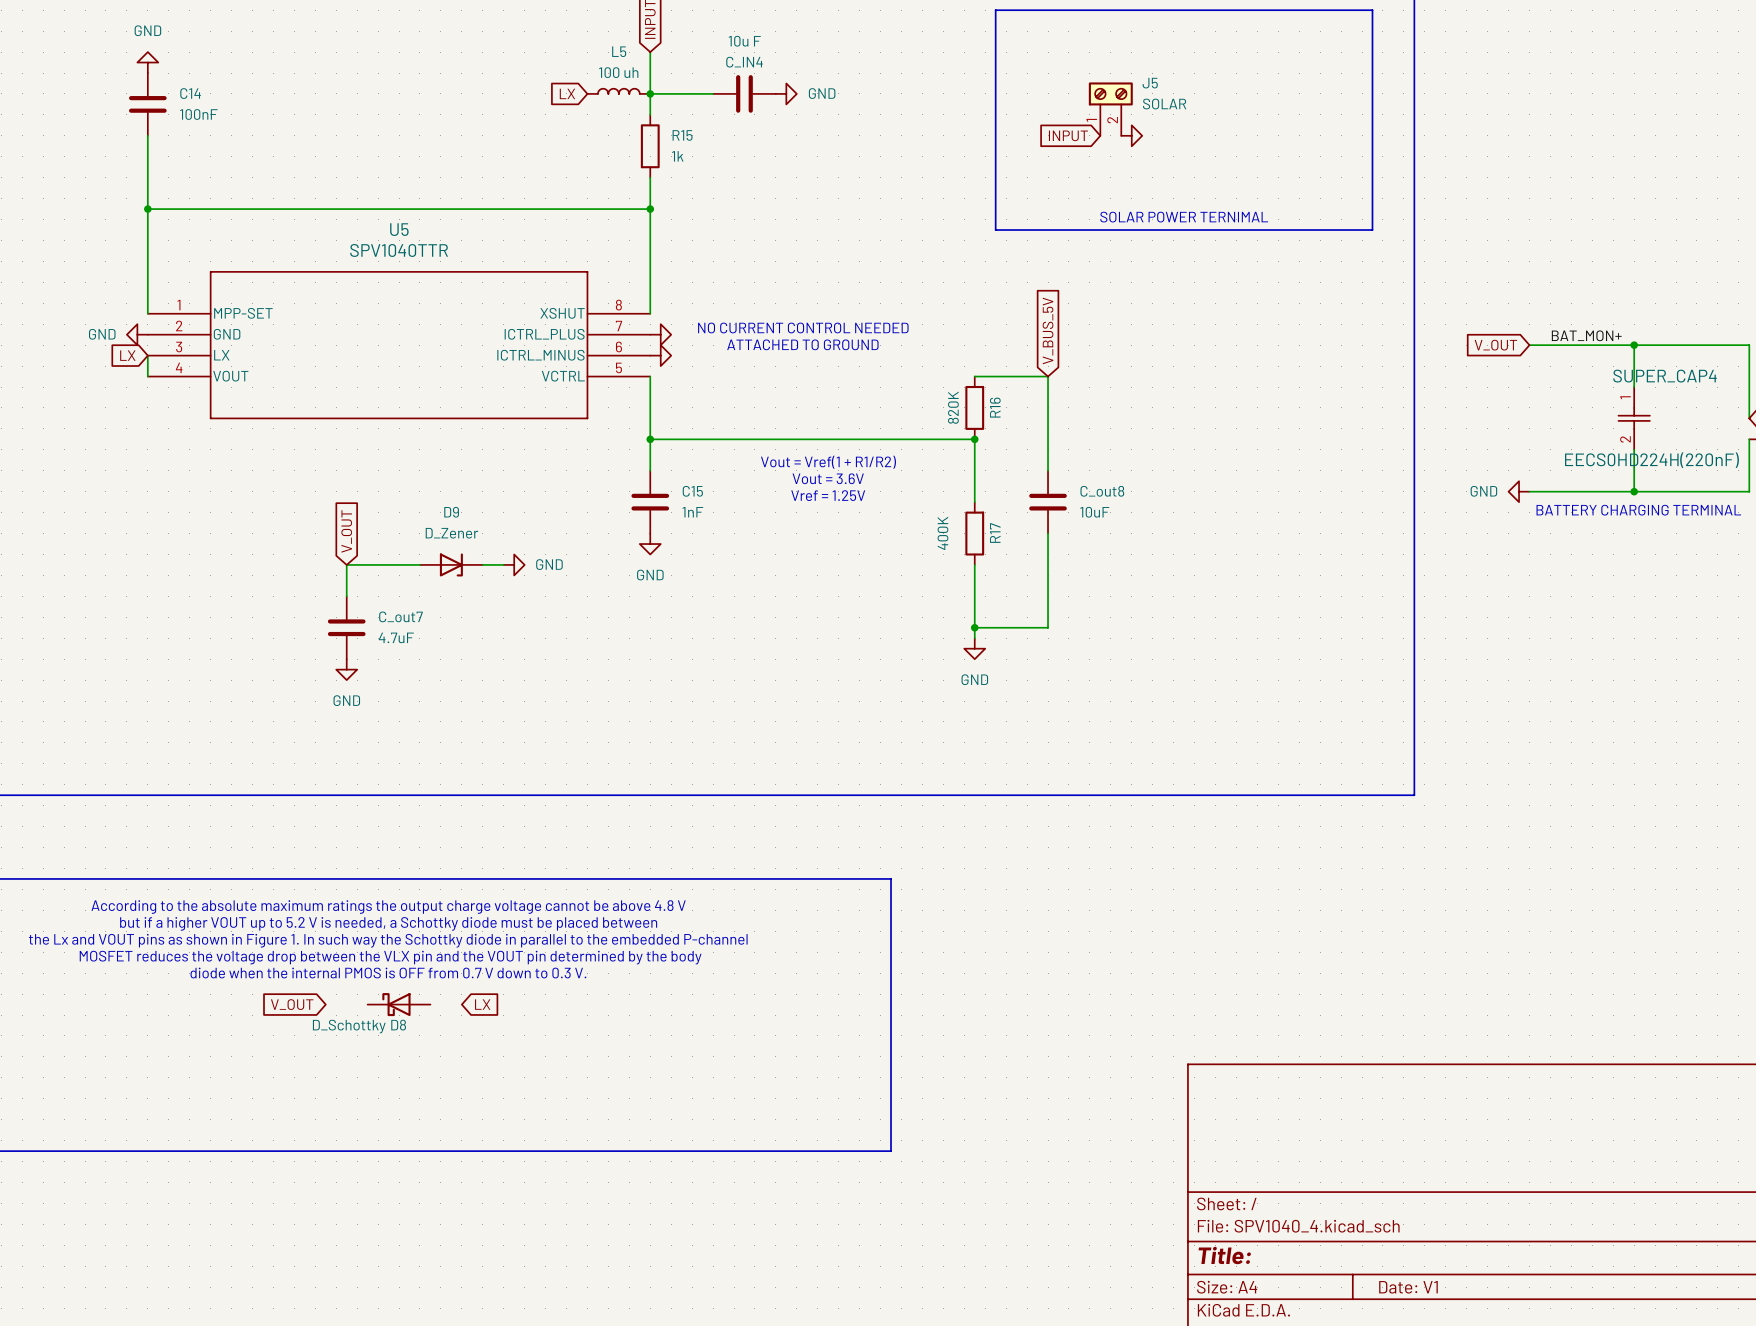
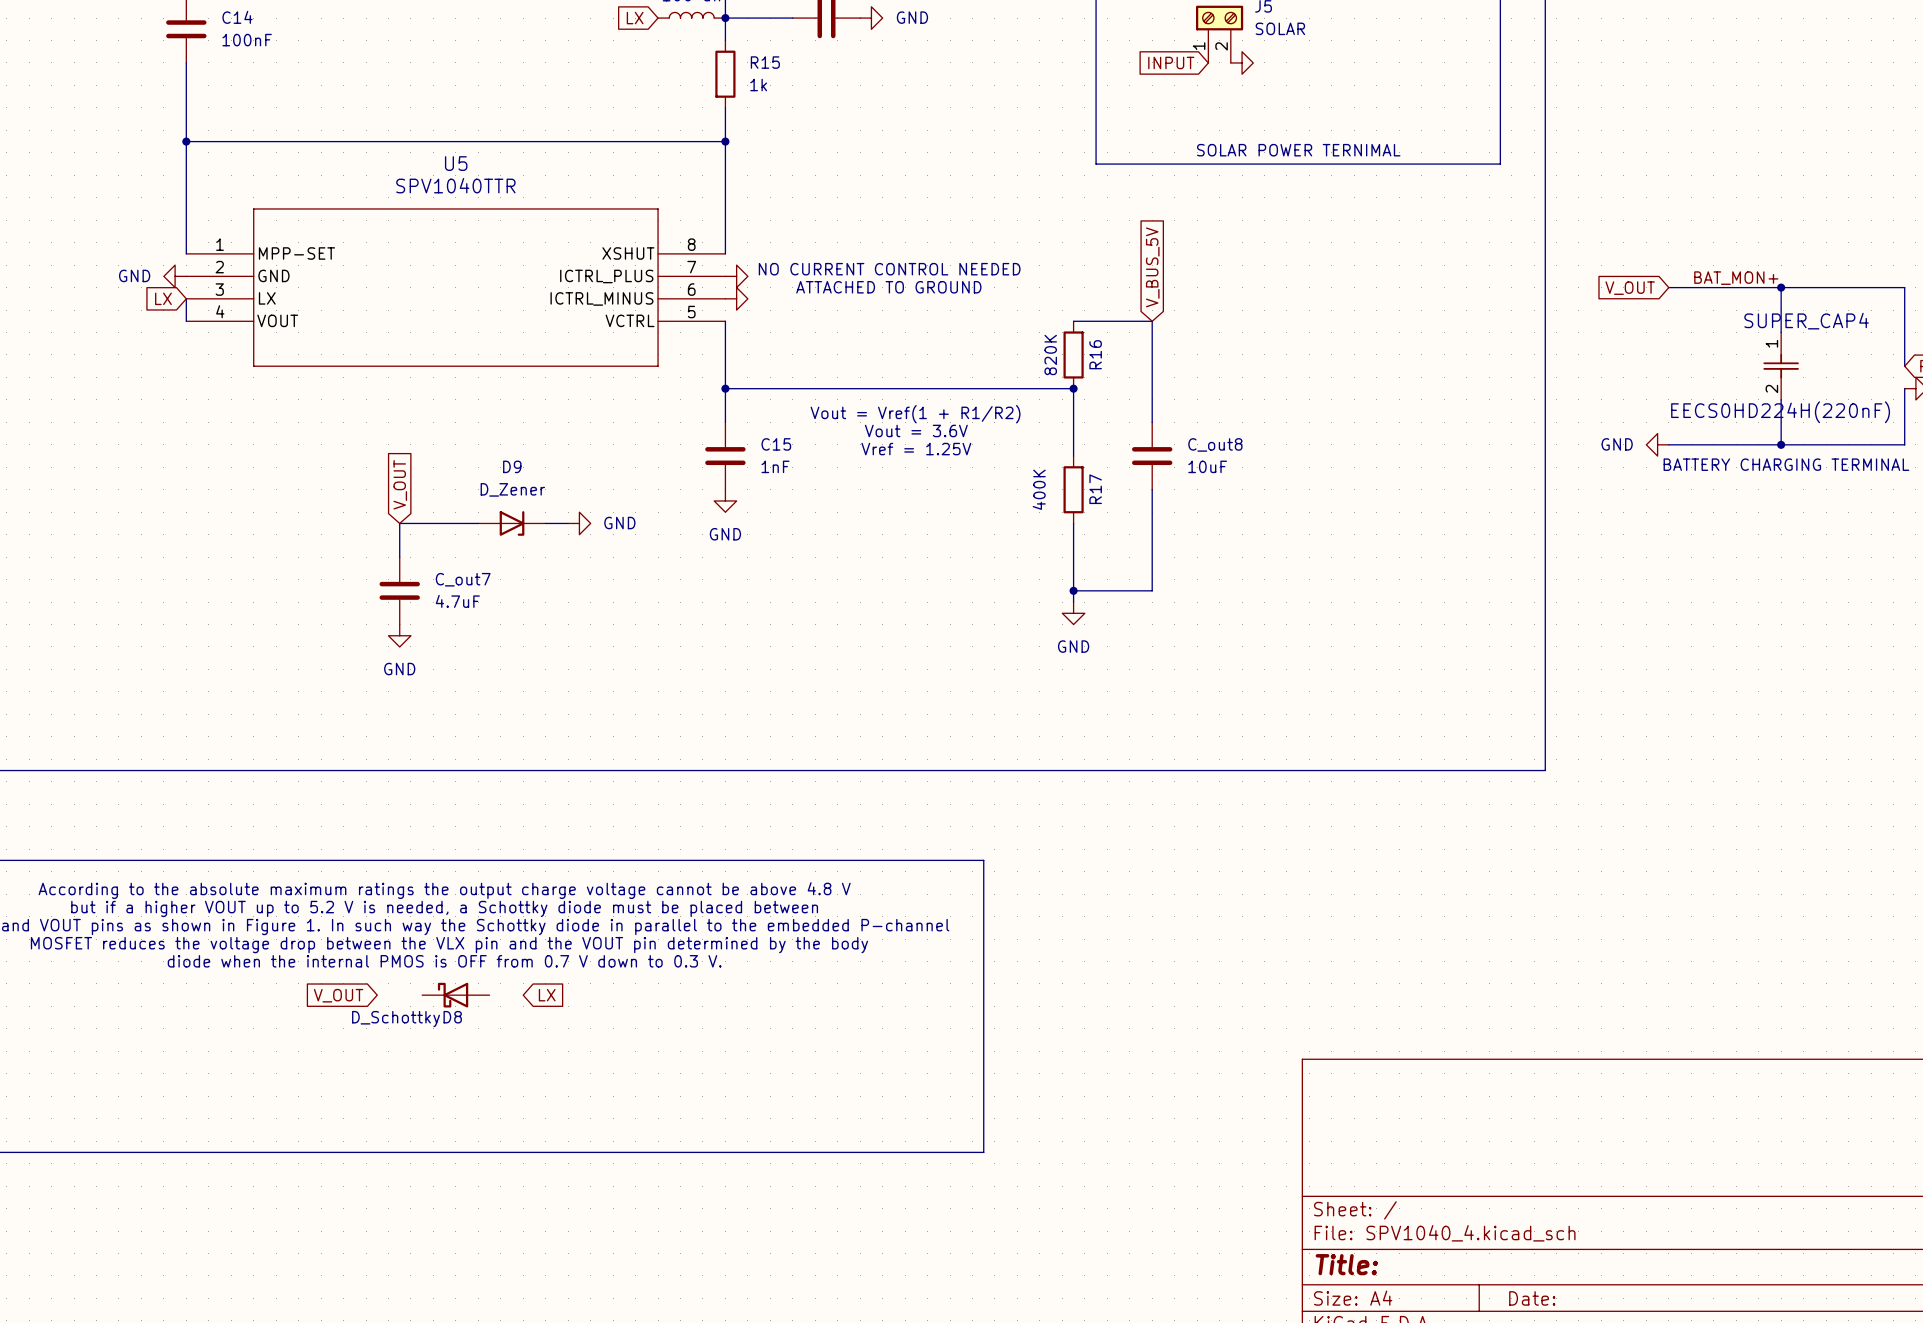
title block: Date: V1 (1408, 1287) -> Date: (1532, 1298)

